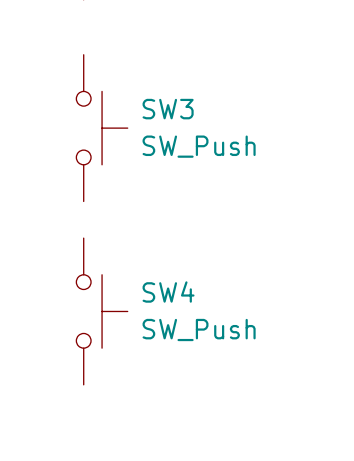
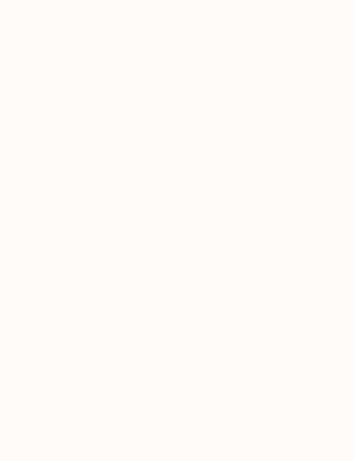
SW3: SW_Push (102, 128) -> none
SW4: SW_Push (102, 311) -> none

